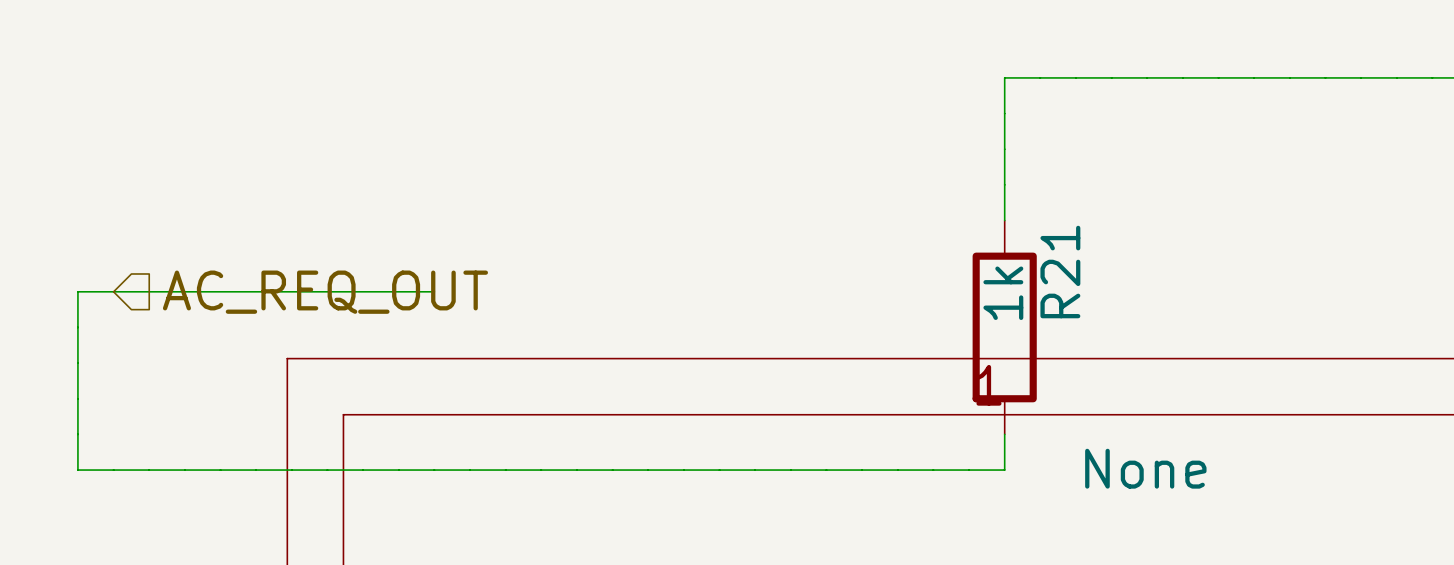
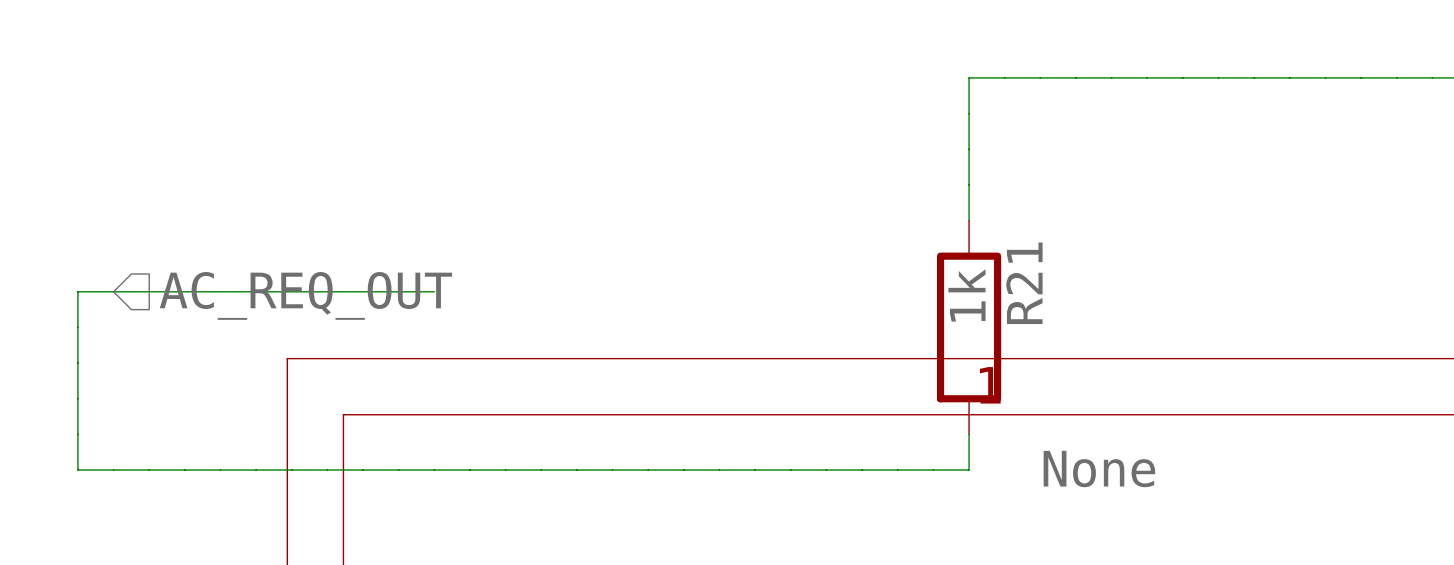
wire: (1004, 77) (1004, 220) -> (1004, 77) (969, 77) (969, 220)
R21 position: (1004, 327) -> (969, 327)
wire: (1004, 434) (1004, 470) (969, 470) -> (969, 434) (969, 470)

